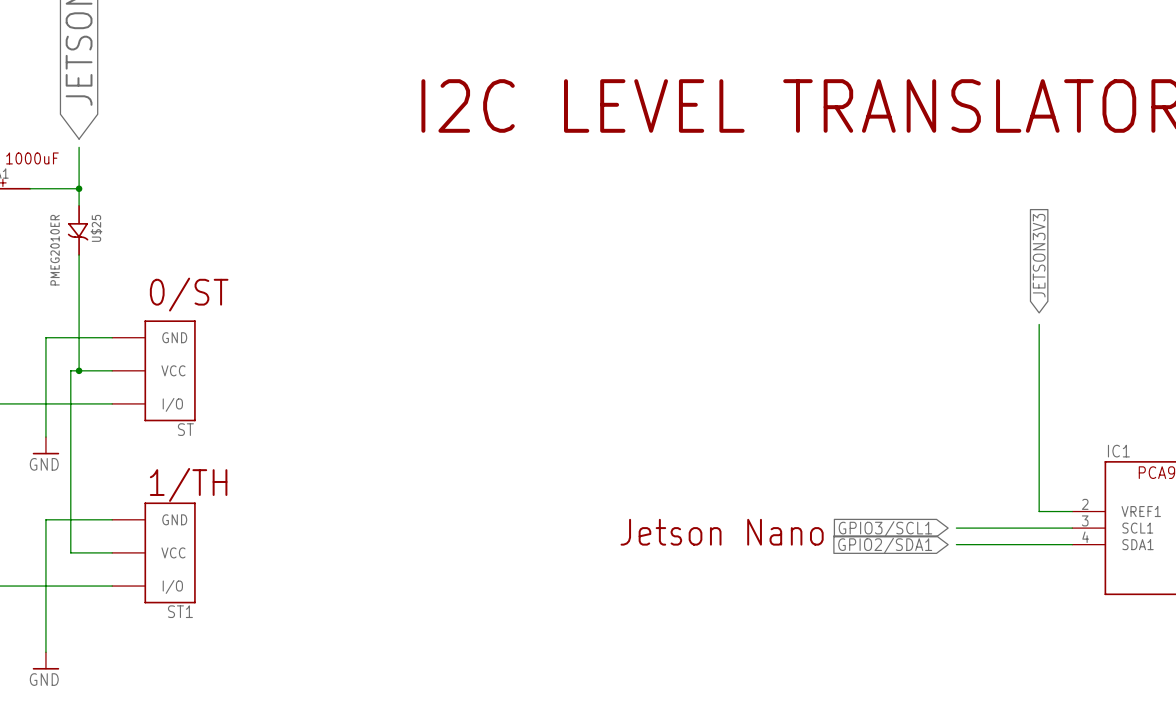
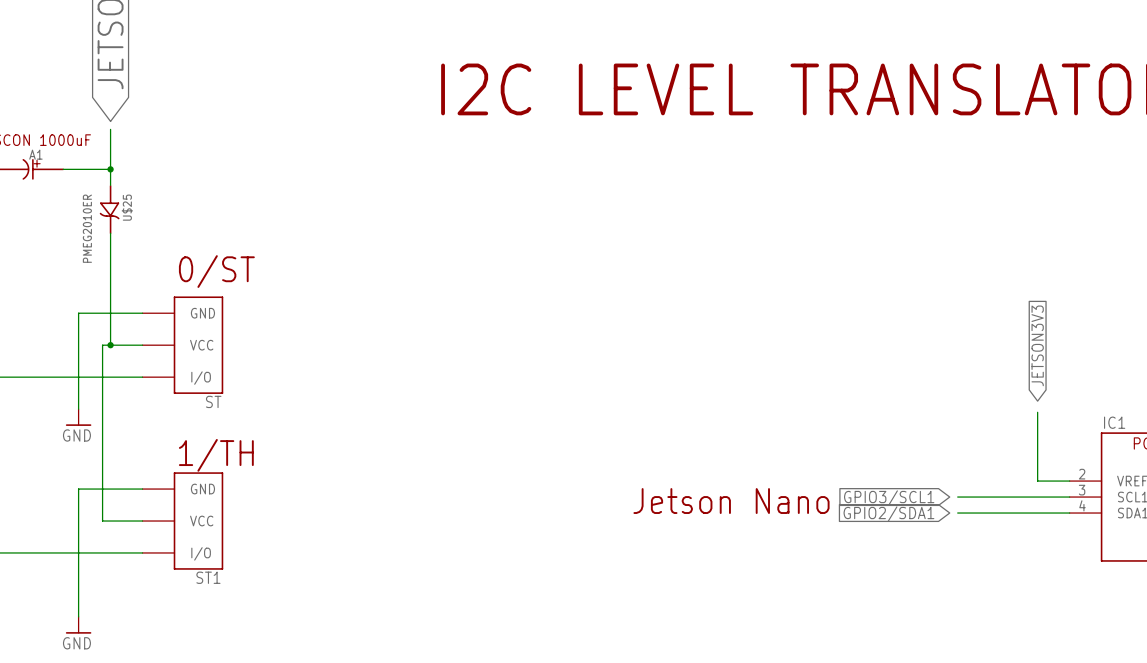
global label position: JETSON3V3 (1039, 255) -> JETSON3V3 (1037, 345)
wire: (1039, 324) (1039, 440) -> none

